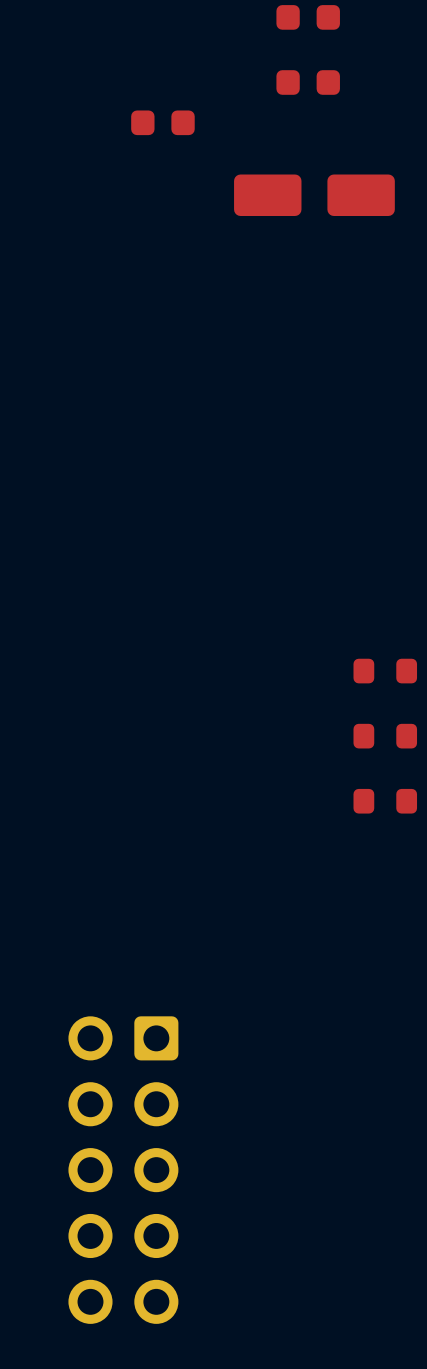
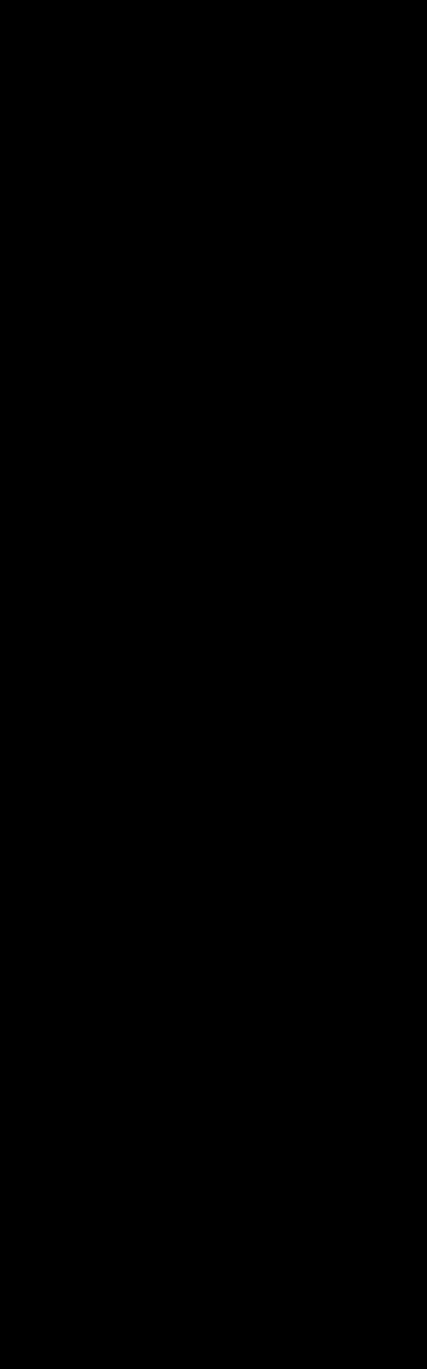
part: (308, 17) -> none
part: (308, 82) -> none
part: (162, 122) -> none
part: (314, 195) -> none
part: (385, 671) -> none
part: (385, 736) -> none
part: (385, 801) -> none
part: (123, 1170) -> none

